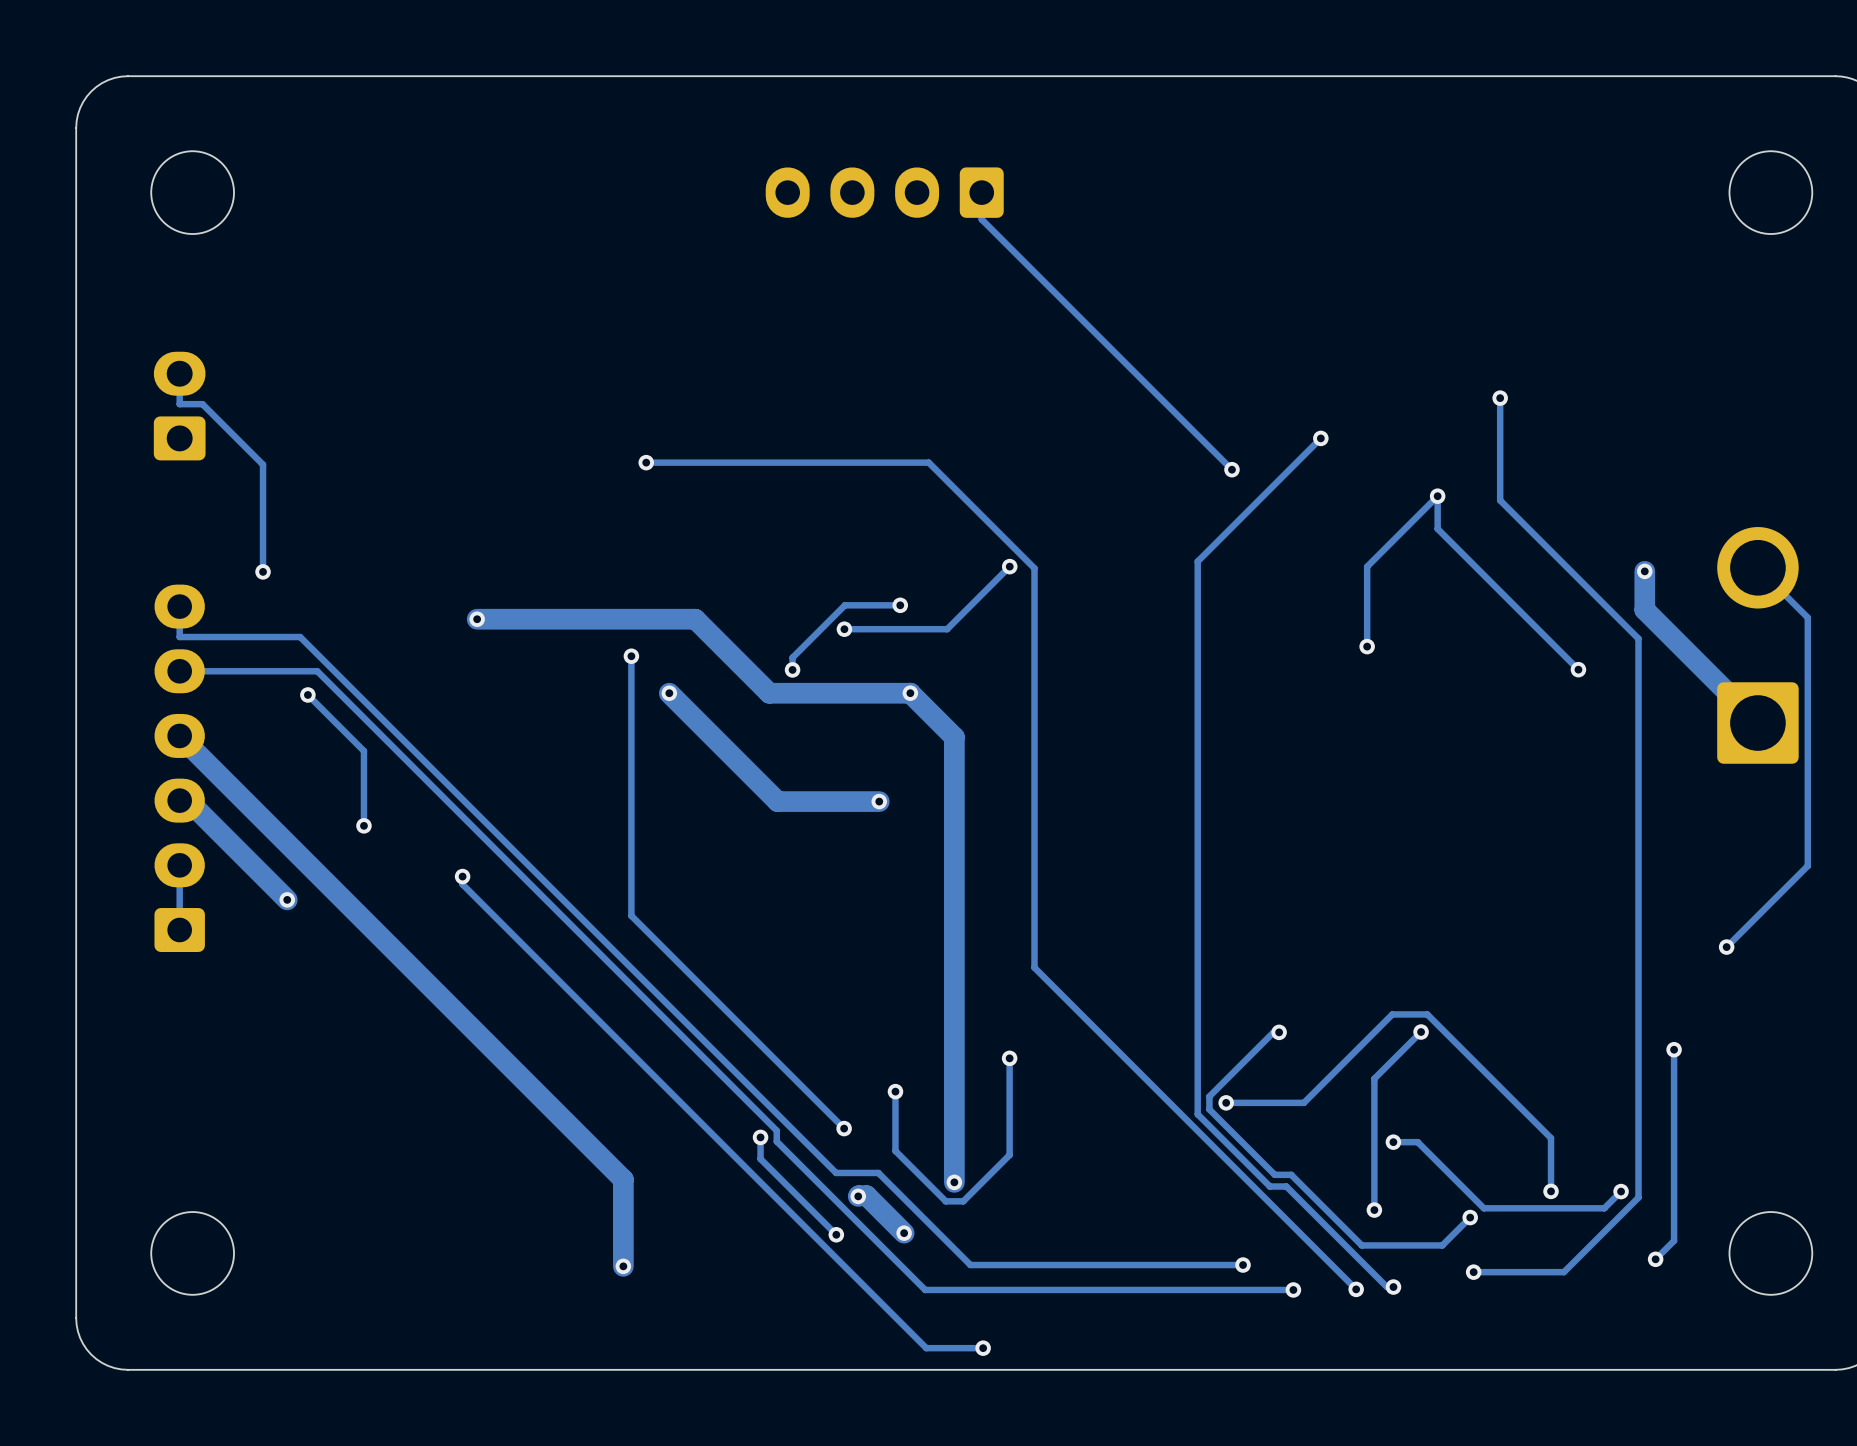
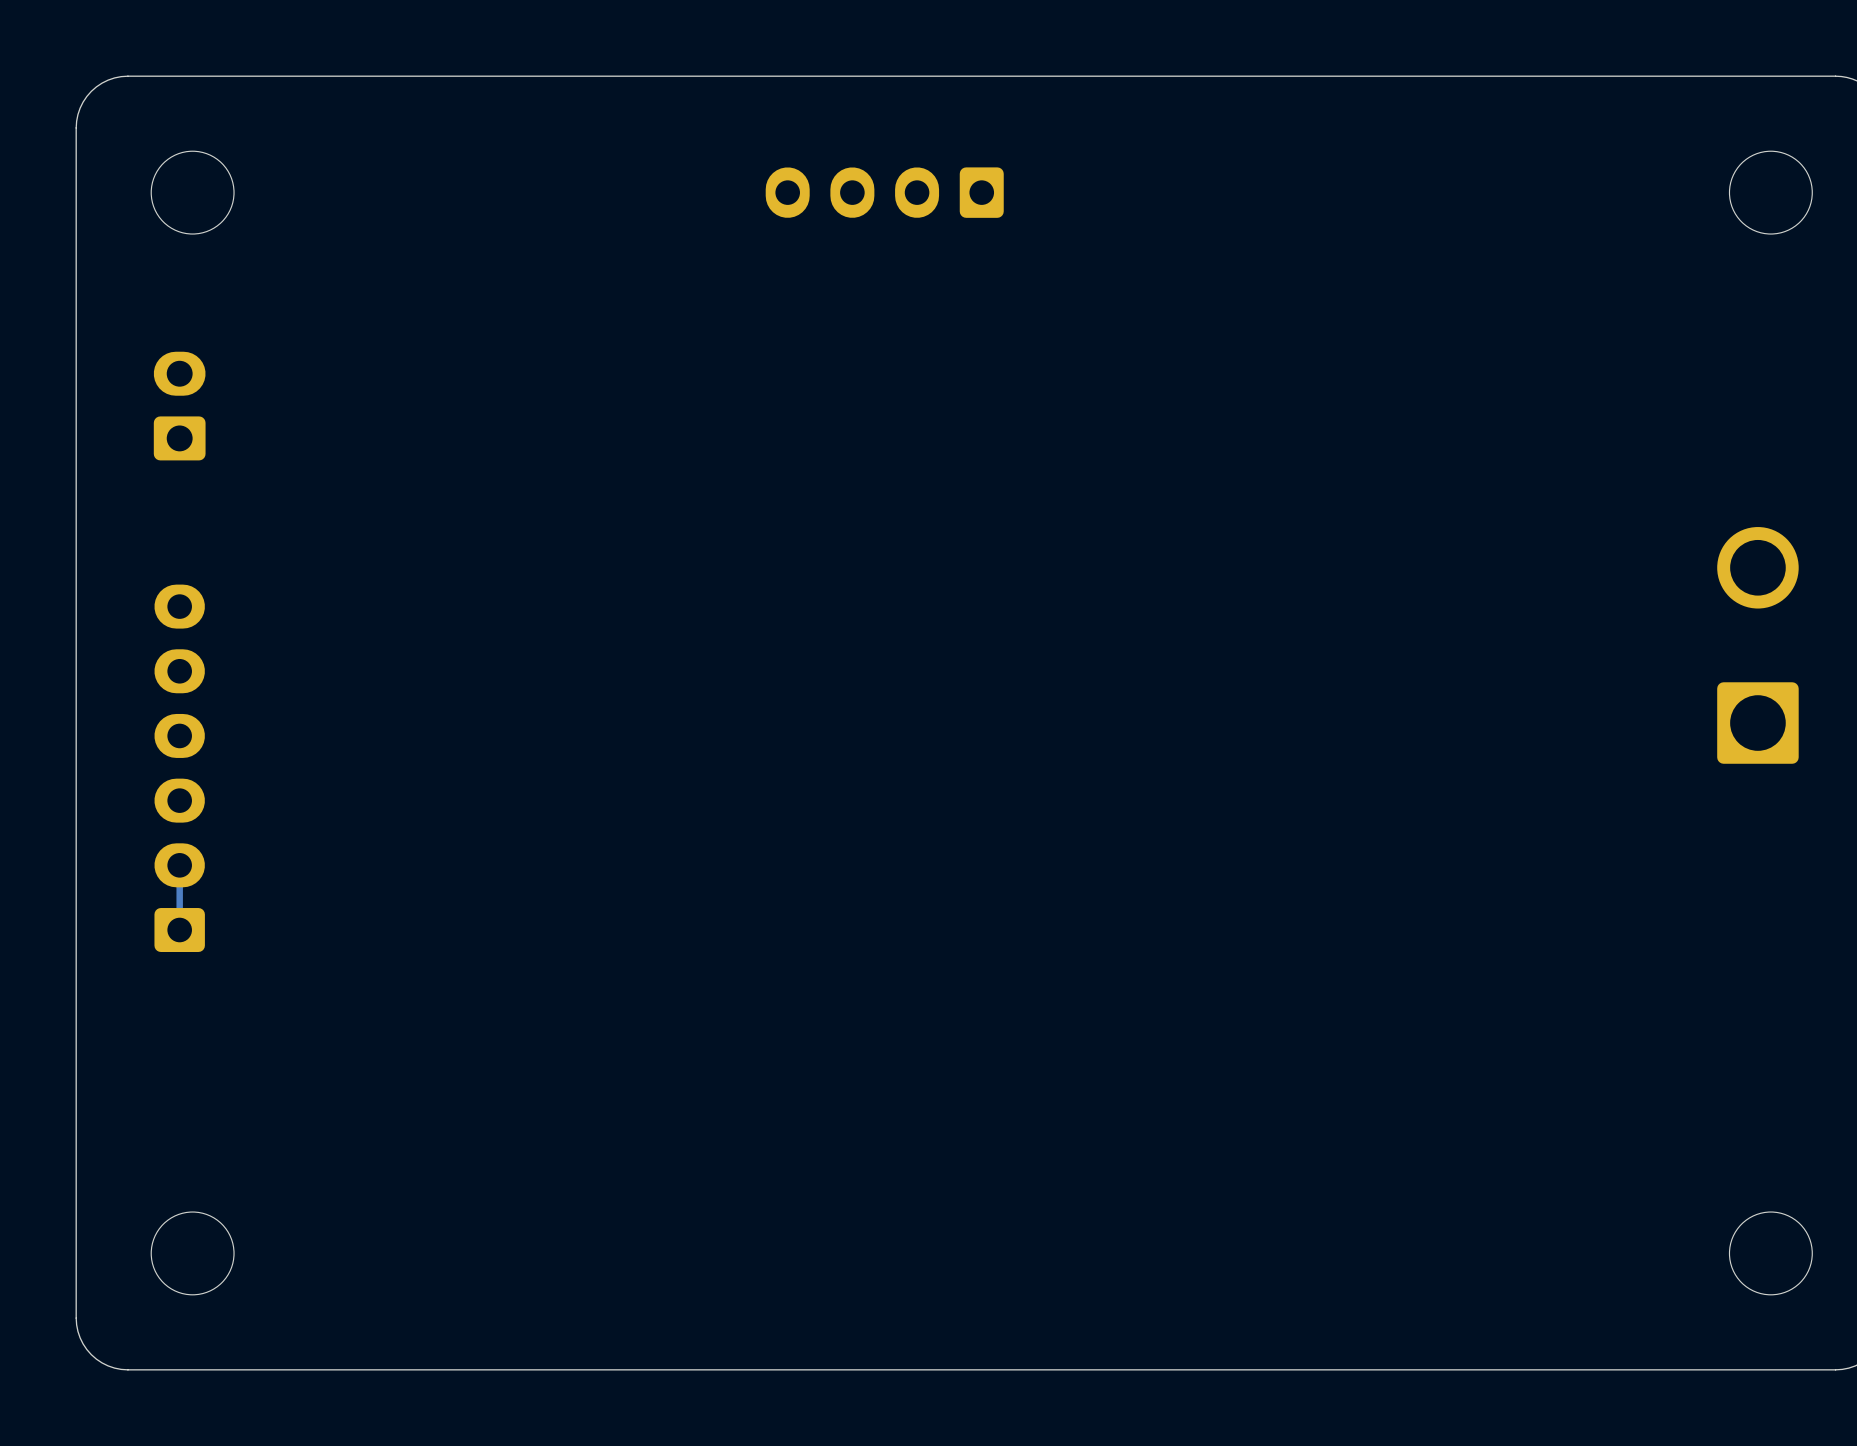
track: (981, 192) (981, 219) (1231, 469) -> none
track: (179, 373) (179, 404) (202, 404) (263, 464) (263, 571) -> none
track: (1500, 398) (1500, 500) (1638, 638) (1638, 1197) (1563, 1272) (1473, 1272) -> none
via: (1500, 398) -> none
track: (1320, 438) (1197, 561) (1197, 1114) (1269, 1186) (1286, 1186) (1386, 1287) (1393, 1287) -> none
via: (1320, 438) -> none
track: (646, 462) (928, 462) (1034, 568) (1034, 967) (1356, 1289) -> none
via: (646, 462) -> none
via: (1231, 469) -> none
via: (1437, 496) -> none
track: (1009, 566) (947, 629) (844, 629) -> none
via: (1009, 566) -> none
track: (1757, 567) (1807, 617) (1807, 865) (1726, 947) -> none
via: (263, 571) -> none
track: (1644, 571) (1644, 609) (1757, 723) -> none
via: (1644, 571) -> none
track: (900, 605) (844, 605) (792, 657) (792, 669) -> none
via: (900, 605) -> none
track: (179, 606) (179, 637) (300, 637) (836, 1172) (878, 1172) (970, 1265) (1243, 1265) -> none
track: (477, 619) (695, 619) (769, 693) (910, 693) (954, 737) (954, 1182) -> none
via: (477, 619) -> none
via: (844, 629) -> none
track: (1367, 646) (1367, 566) (1437, 496) (1437, 528) (1578, 669) -> none
via: (1367, 646) -> none
track: (631, 656) (631, 915) (844, 1128) -> none
via: (631, 656) -> none
via: (792, 669) -> none
via: (1578, 669) -> none
track: (179, 671) (317, 671) (776, 1130) (776, 1141) (925, 1289) (1293, 1289) -> none
track: (669, 693) (777, 801) (879, 801) -> none
via: (669, 693) -> none
via: (910, 693) -> none
track: (307, 694) (363, 751) (363, 825) -> none
via: (307, 694) -> none
track: (179, 735) (623, 1179) (623, 1266) -> none
track: (179, 800) (187, 800) (287, 899) -> none
via: (879, 801) -> none
via: (363, 825) -> none
track: (462, 876) (462, 884) (926, 1348) (983, 1348) -> none
via: (462, 876) -> none
via: (287, 899) -> none
via: (1726, 947) -> none
track: (1279, 1032) (1273, 1032) (1209, 1096) (1209, 1109) (1274, 1174) (1291, 1174) (1361, 1245) (1442, 1245) (1470, 1217) -> none
via: (1279, 1032) -> none
track: (1421, 1032) (1374, 1078) (1374, 1210) -> none
via: (1421, 1032) -> none
track: (1674, 1049) (1674, 1240) (1655, 1259) -> none
via: (1674, 1049) -> none
track: (1009, 1058) (1009, 1155) (963, 1201) (945, 1201) (895, 1150) (895, 1091) -> none
via: (1009, 1058) -> none
via: (895, 1091) -> none
track: (1226, 1102) (1303, 1102) (1392, 1014) (1427, 1014) (1551, 1138) (1551, 1191) -> none
via: (1226, 1102) -> none
via: (844, 1128) -> none
track: (760, 1137) (760, 1158) (836, 1234) -> none
via: (760, 1137) -> none
track: (1393, 1142) (1417, 1142) (1483, 1208) (1604, 1208) (1621, 1191) -> none
via: (1393, 1142) -> none
via: (954, 1182) -> none
via: (1551, 1191) -> none
via: (1621, 1191) -> none
track: (858, 1196) (866, 1195) (904, 1233) -> none
via: (858, 1196) -> none
via: (1374, 1210) -> none
via: (1470, 1217) -> none
via: (904, 1233) -> none
via: (836, 1234) -> none
via: (1655, 1259) -> none
via: (1243, 1265) -> none
via: (623, 1266) -> none
via: (1473, 1272) -> none
via: (1393, 1287) -> none
via: (1293, 1289) -> none
via: (1356, 1289) -> none
via: (983, 1348) -> none

